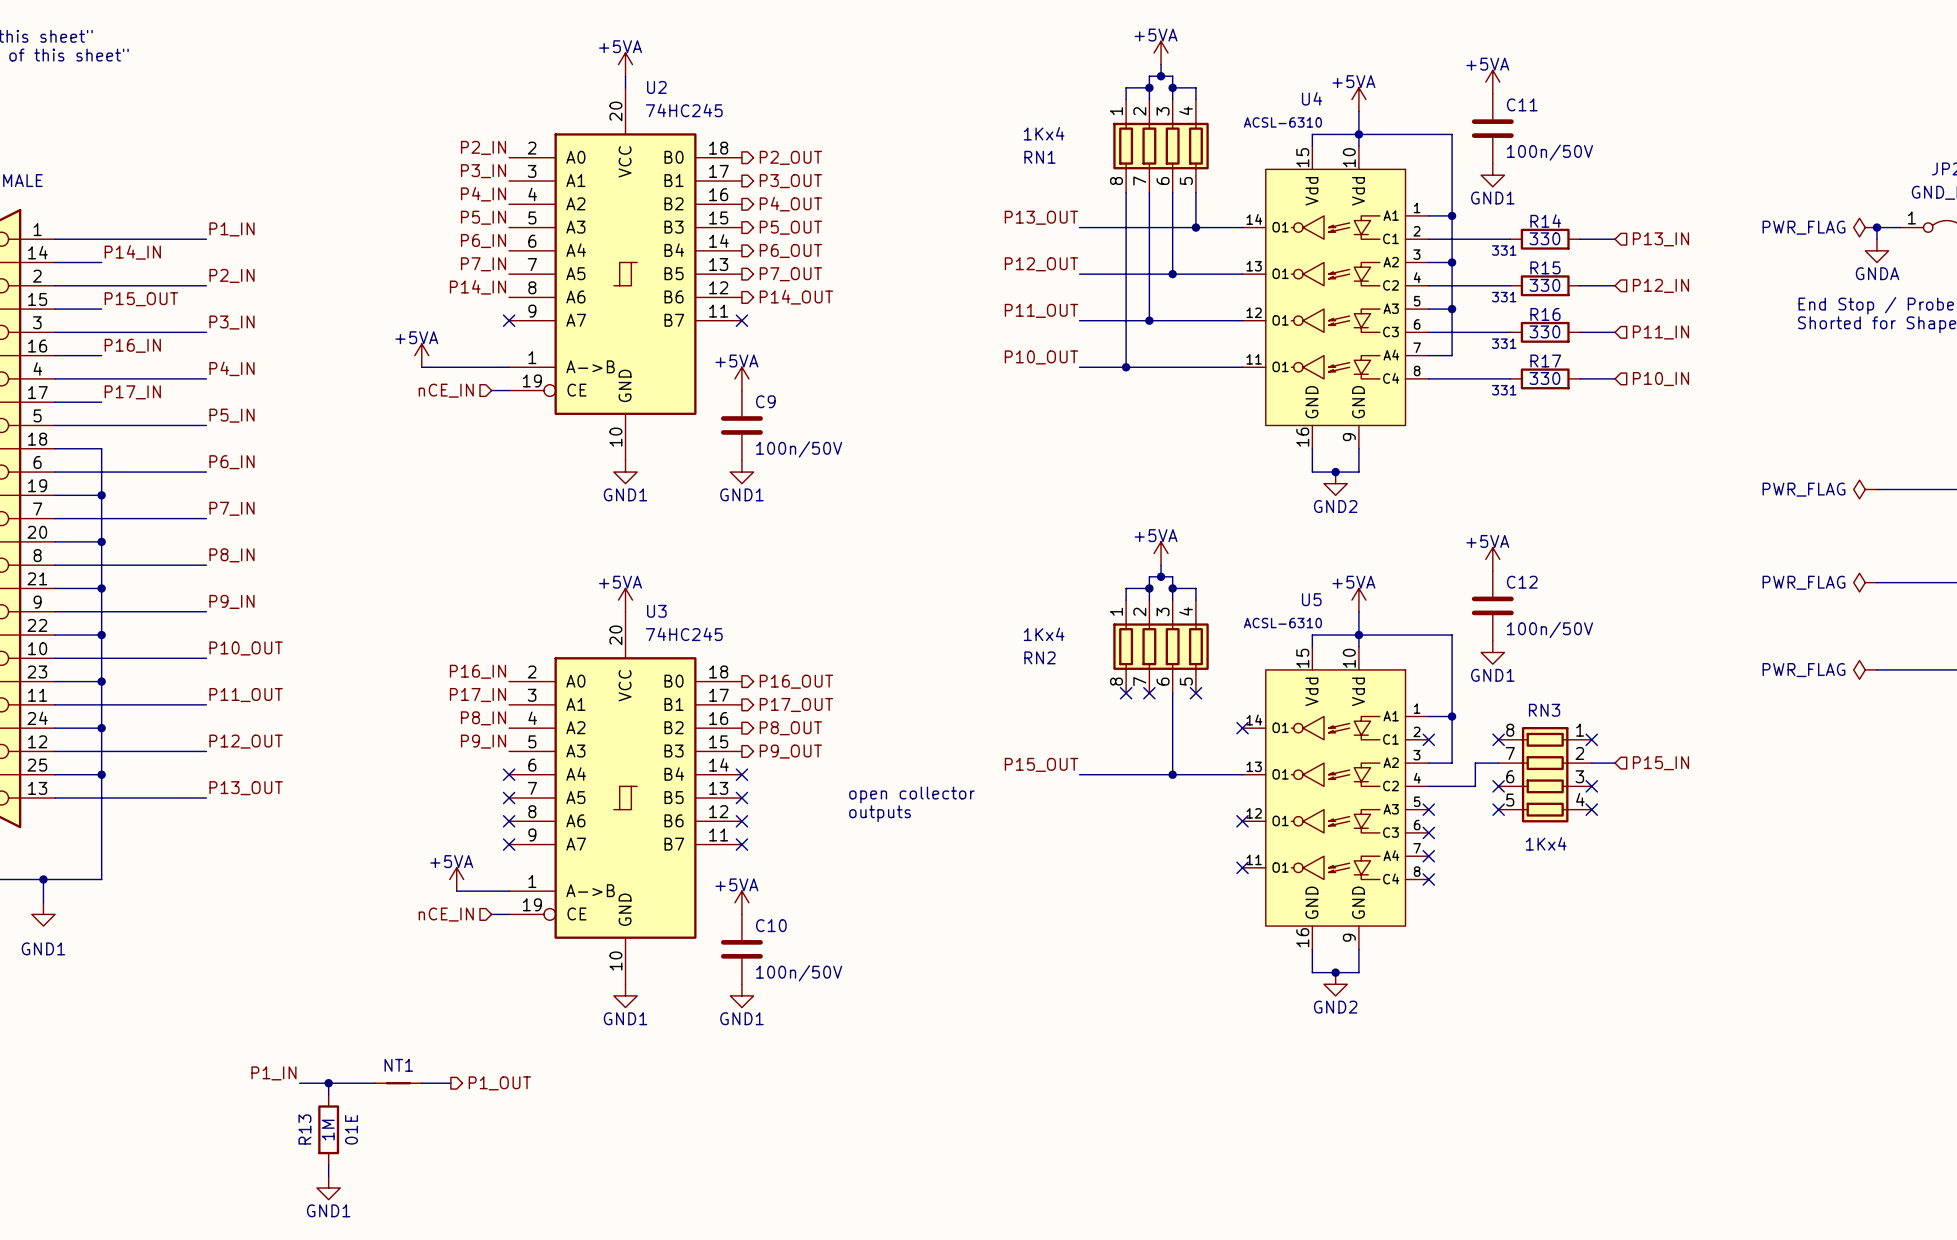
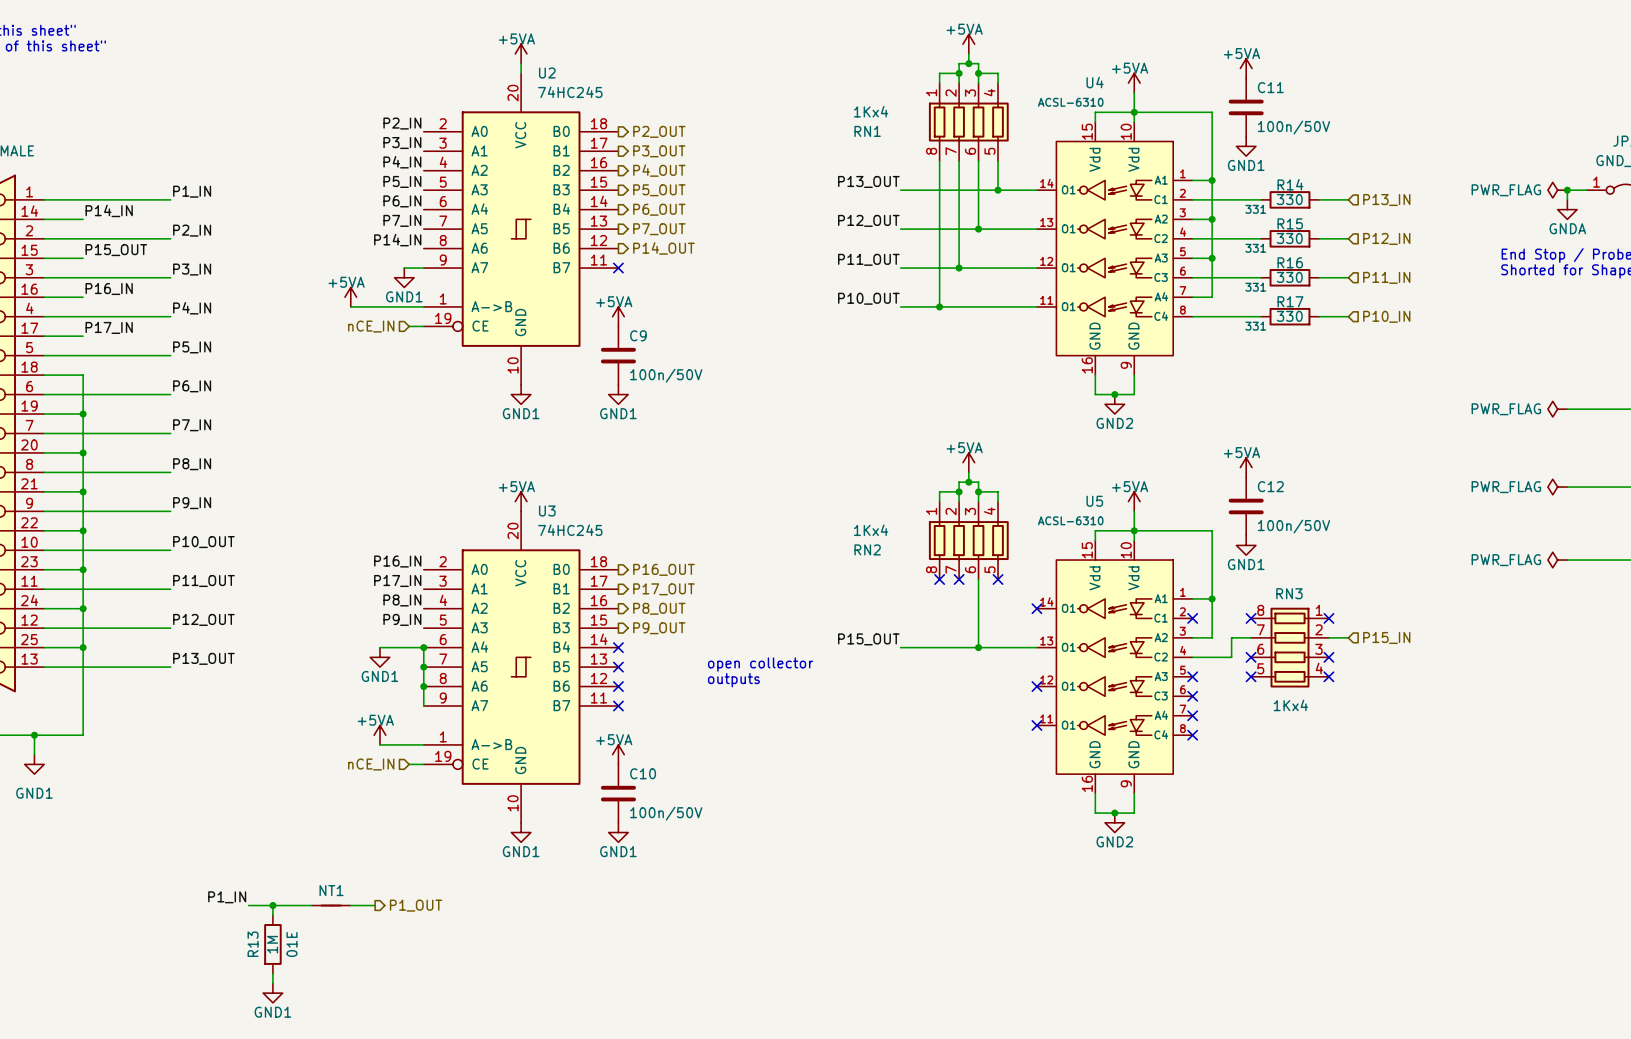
wire: none -> (404, 268) (423, 268)
no-connect mark: (509, 320) -> none
power symbol: none -> GND1 (404, 277)
wire: none -> (379, 647) (423, 647) (423, 706)
no-connect mark: (509, 774) -> none
junction: none -> (423, 647)
power symbol: none -> GND1 (379, 657)
no-connect mark: (509, 798) -> none
junction: none -> (423, 667)
no-connect mark: (509, 821) -> none
junction: none -> (423, 686)
no-connect mark: (509, 844) -> none

